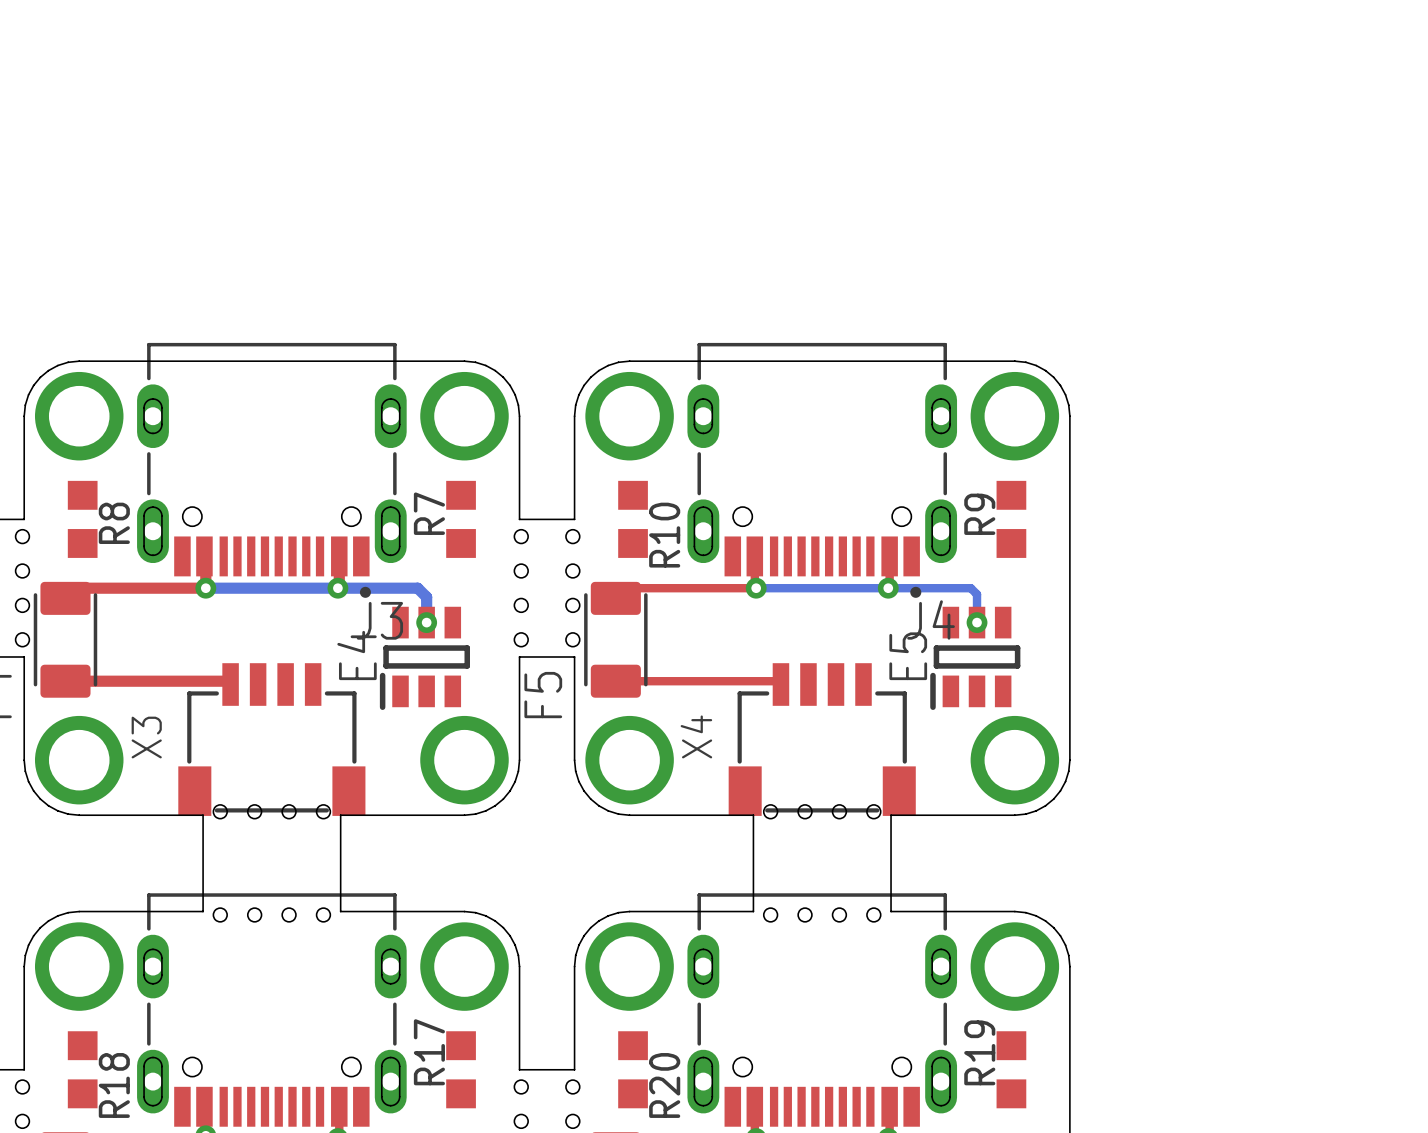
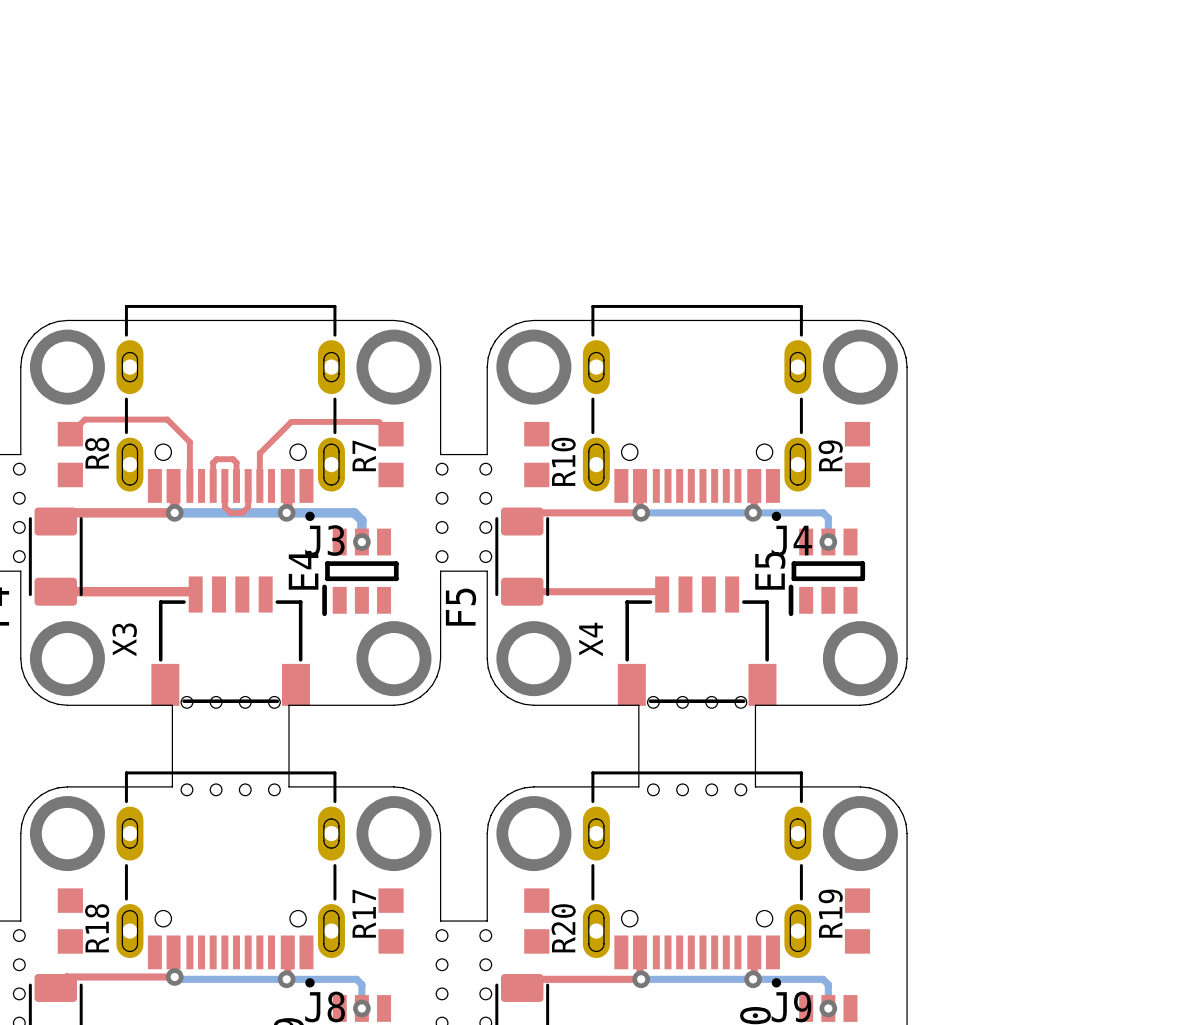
top track: none -> (70, 434) (84, 419) (167, 419) (189, 442) (189, 485)
top track: none -> (391, 434) (378, 421) (291, 421) (259, 453) (259, 485)
top track: none -> (213, 485) (213, 462) (216, 459) (233, 459) (236, 462) (236, 485)
top track: none -> (224, 485) (224, 507) (230, 512) (242, 512) (248, 507) (248, 485)

